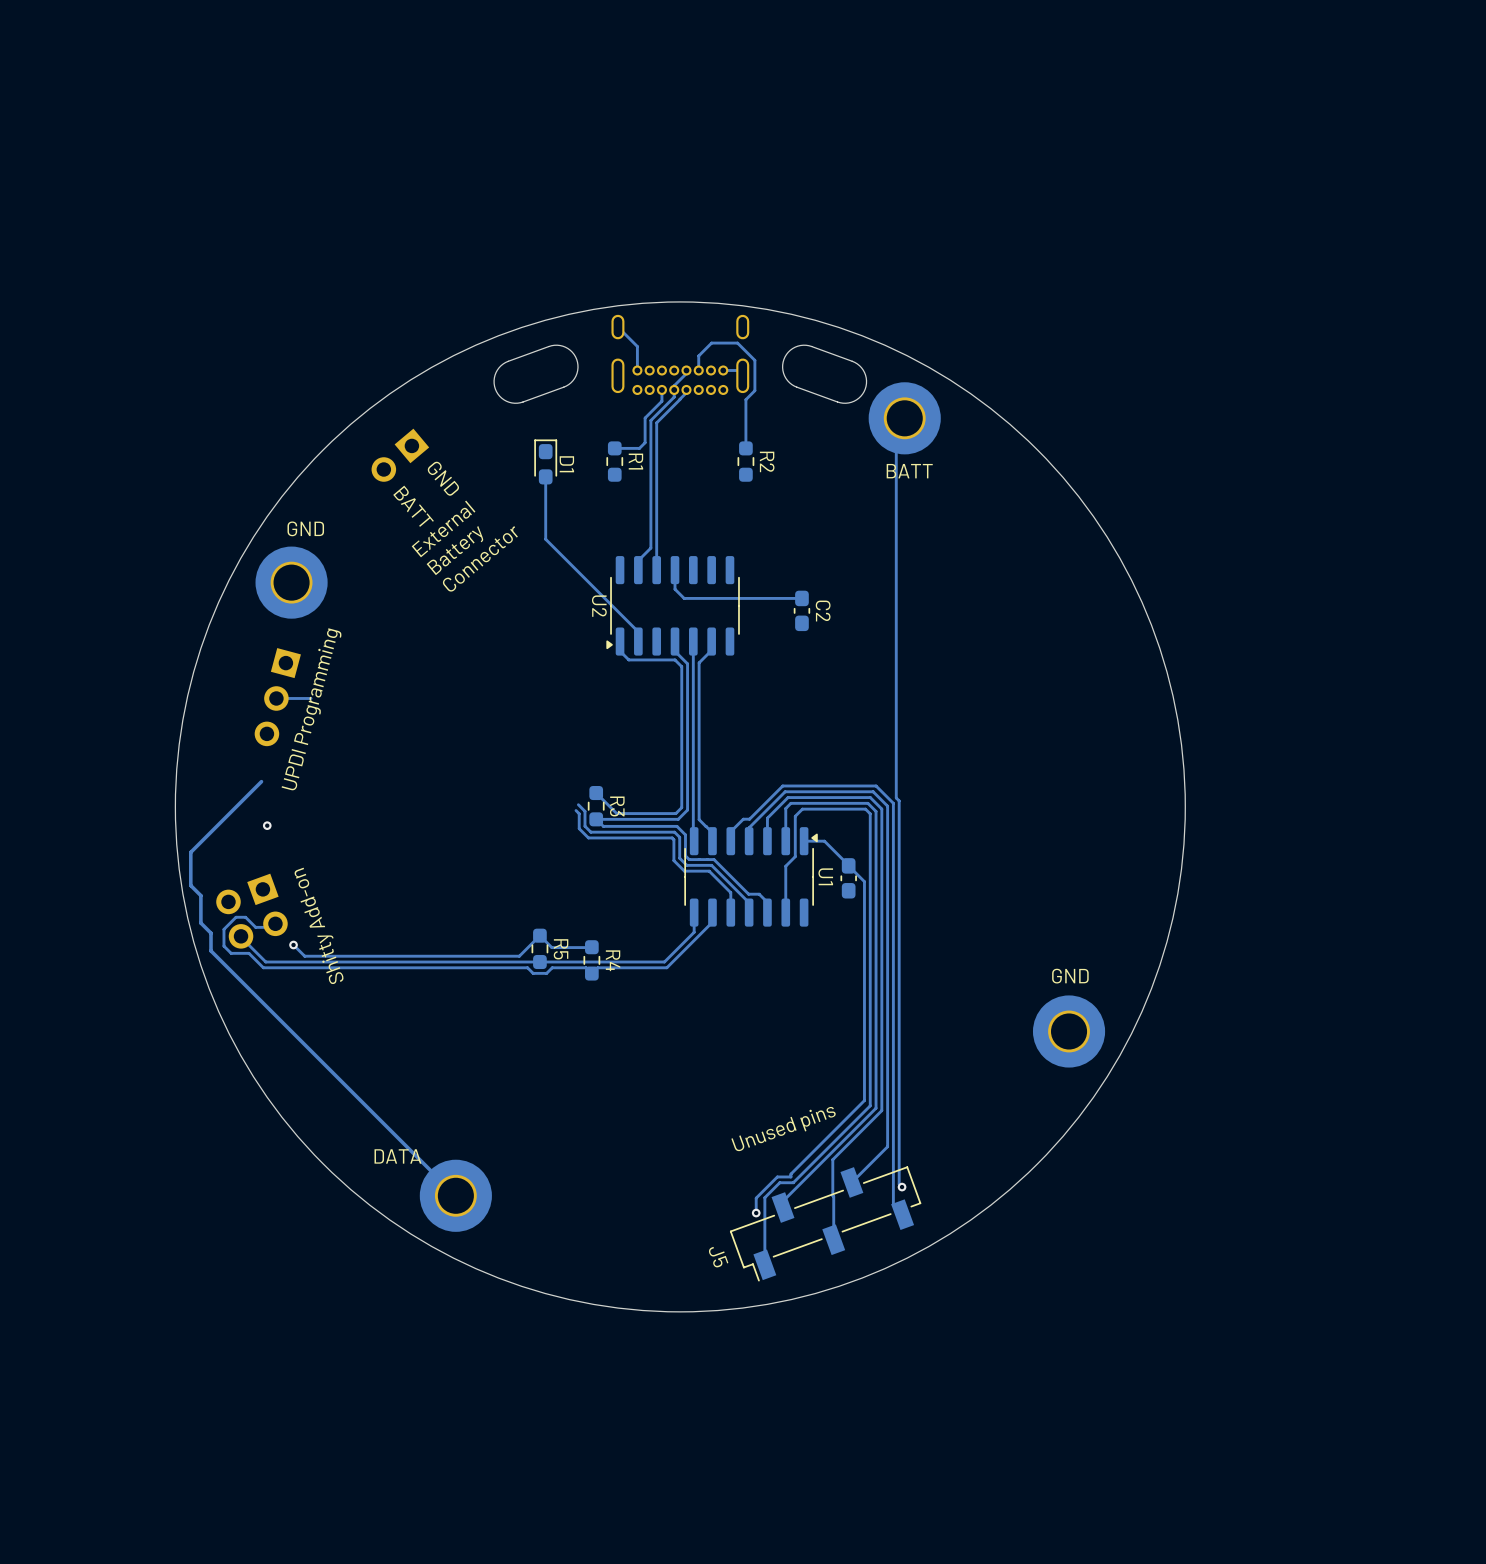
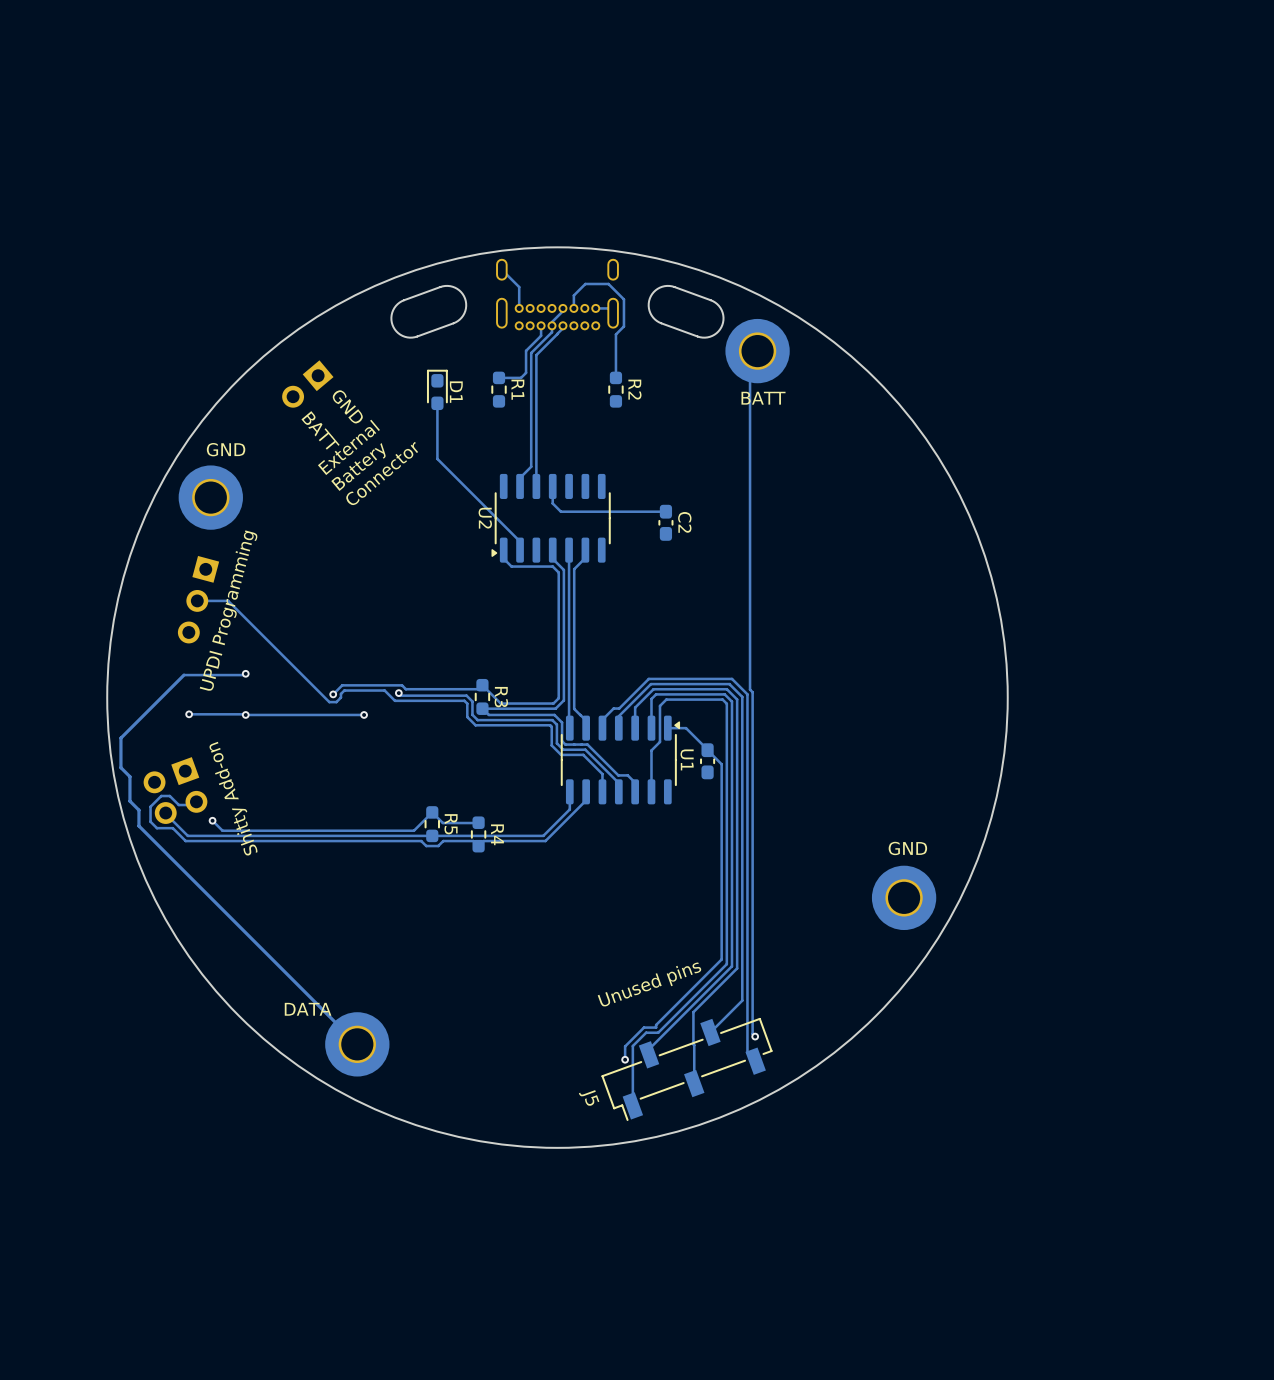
track: none -> (228, 600) (329, 702) (336, 702) (344, 690) (384, 690) (394, 700) (464, 700)
track: none -> (245, 673) (183, 675)
via: none -> (245, 673)
track: none -> (478, 689) (405, 689) (402, 685) (342, 685) (333, 694)
track: none -> (398, 693) (398, 695) (466, 695)
via: none -> (398, 693)
via: none -> (333, 694)
track: none -> (189, 714) (364, 714)
via: none -> (245, 714)
via: none -> (364, 714)

